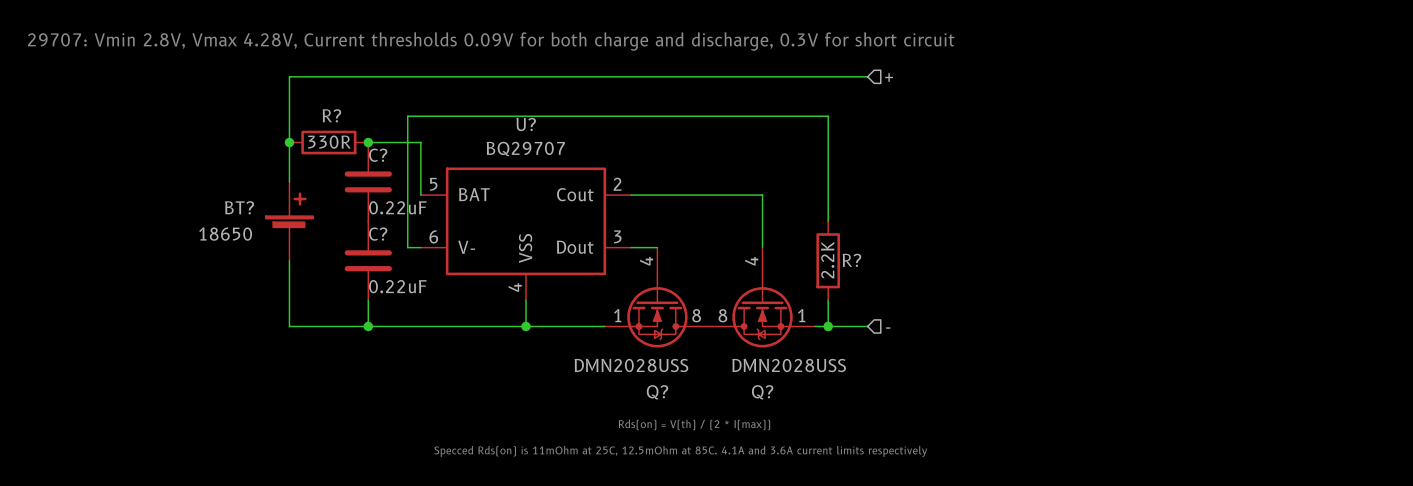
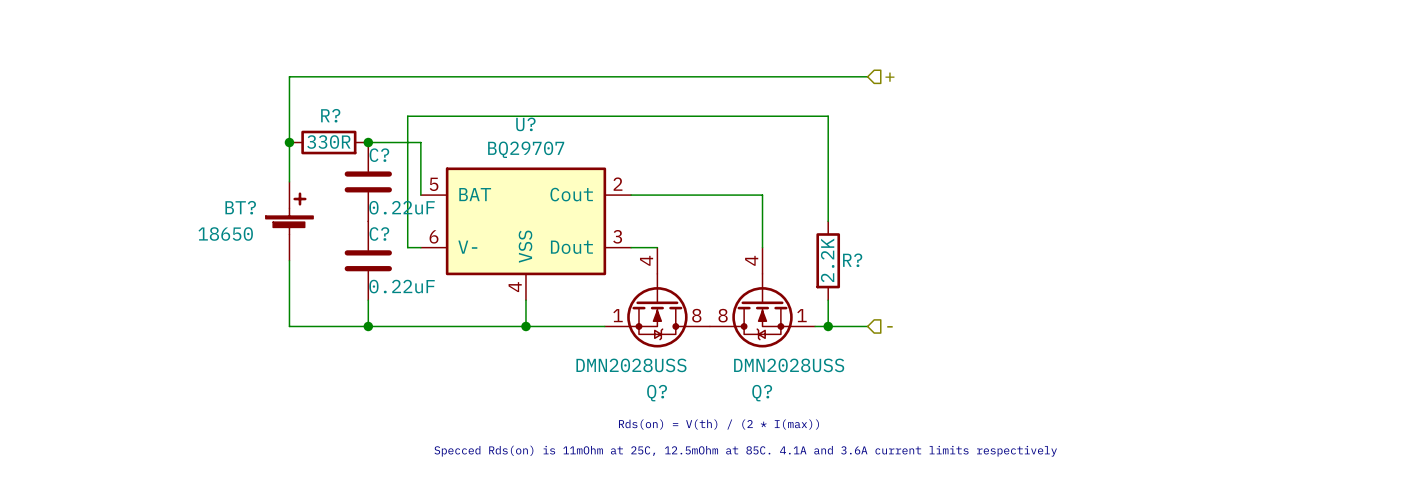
text: 29707: Vmin 2.8V, Vmax 4.28V, Current thresholds 0.09V for both charge and discharge, 0.3V for short circuit (491, 41) -> none

